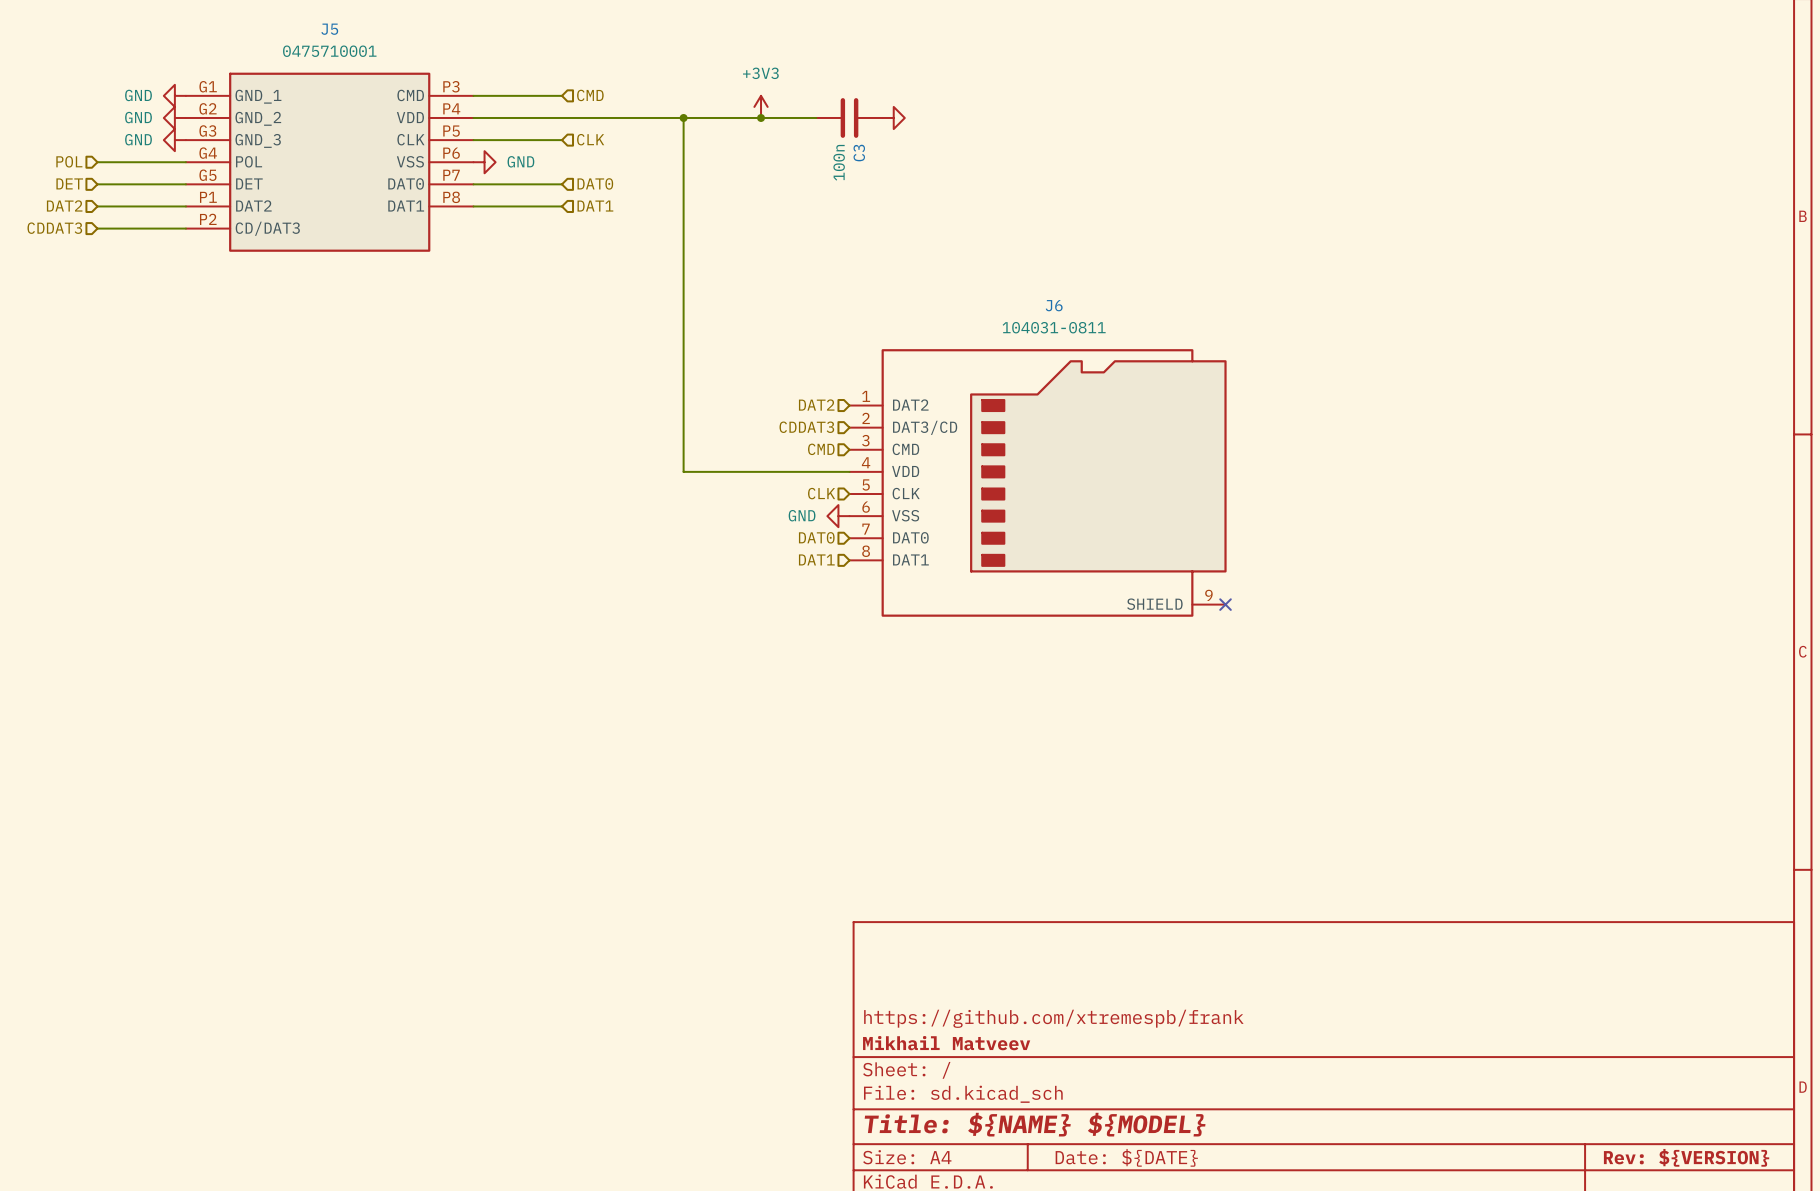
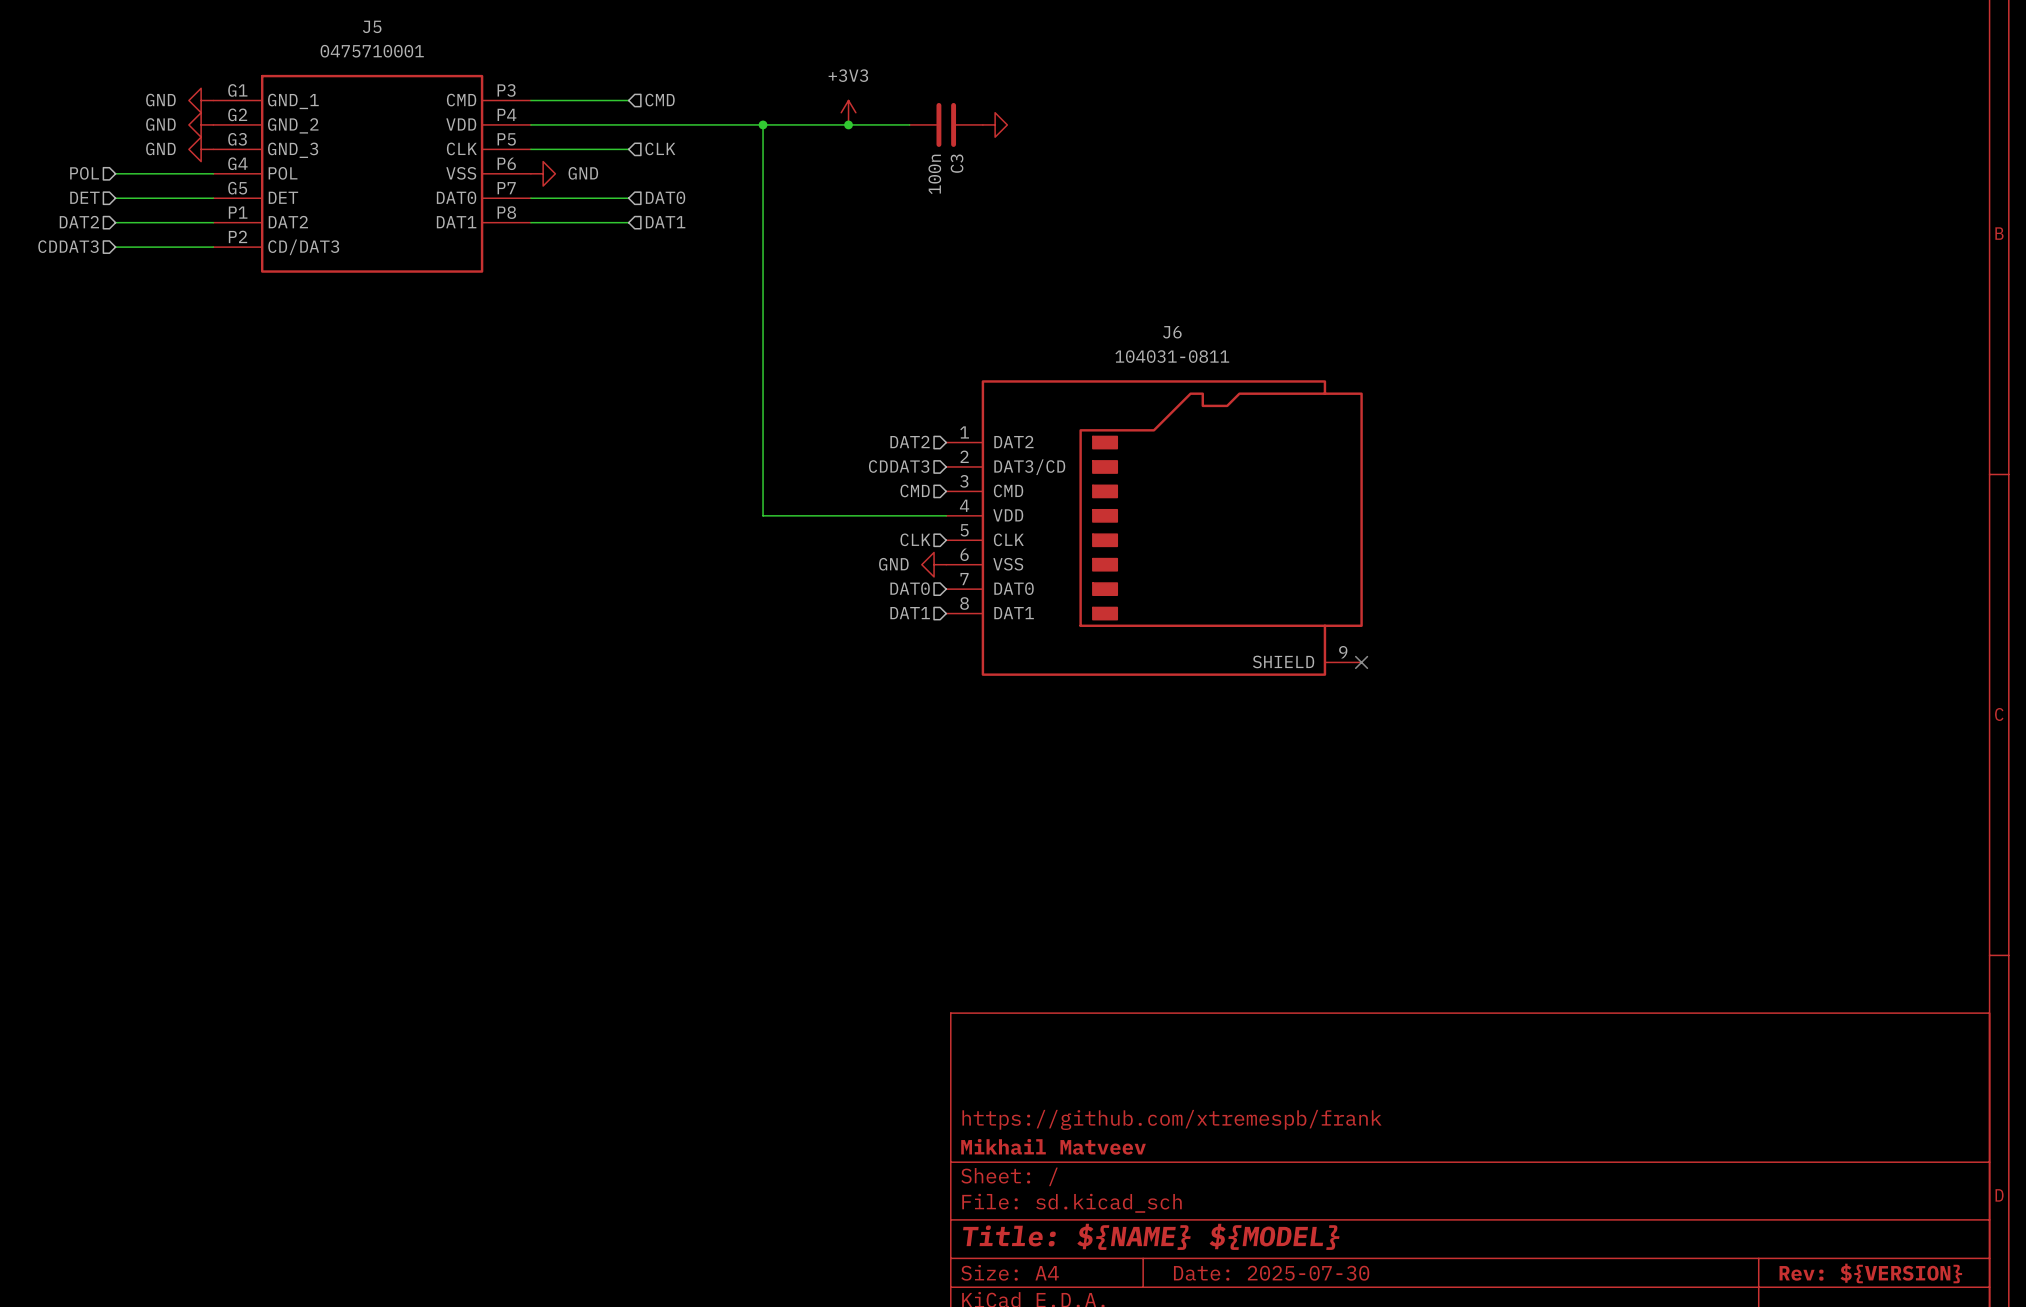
title block: Date: ${DATE} (1126, 1157) -> Date: 2025-07-30 (1271, 1273)

